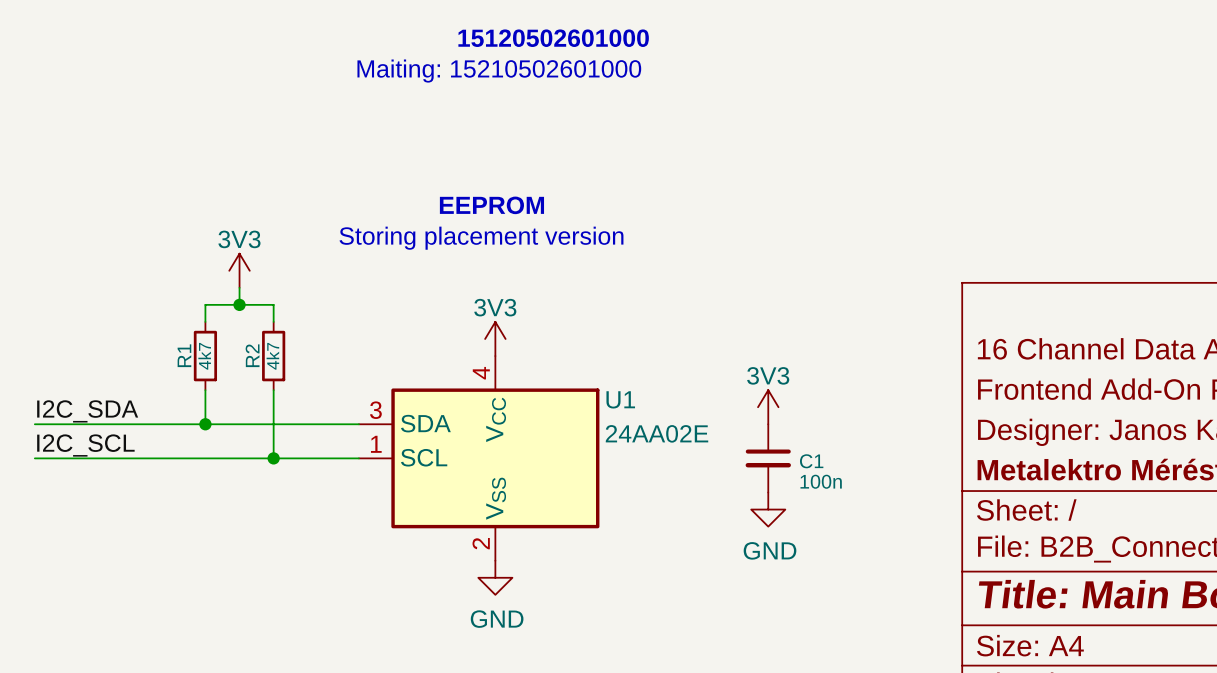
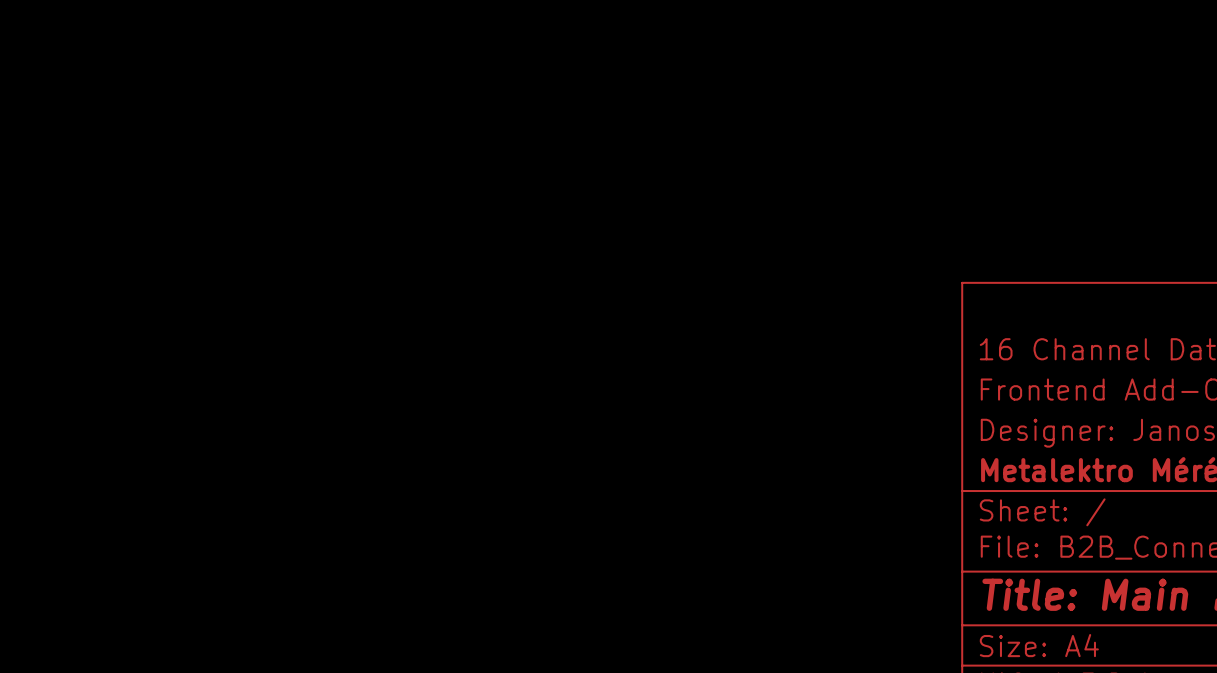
text: 15120502601000 (553, 38) -> none
text: Maiting: 15210502601000 (499, 71) -> none
text: EEPROM (491, 205) -> none
text: Storing placement version (481, 238) -> none
power symbol: 3V3 (239, 270) -> none
wire: (239, 287) (239, 304) -> none
junction: (239, 304) -> none
wire: (205, 321) (205, 304) (273, 304) (273, 321) -> none
power symbol: 3V3 (495, 338) -> none
R1: 4k7 (205, 356) -> none
R2: 4k7 (273, 356) -> none
wire: (205, 390) (205, 424) -> none
wire: (273, 390) (273, 458) -> none
power symbol: 3V3 (768, 407) -> none
label: I2C_SDA (87, 411) -> none
wire: (34, 424) (358, 424) -> none
junction: (205, 424) -> none
label: I2C_SCL (85, 445) -> none
wire: (34, 458) (358, 458) -> none
junction: (273, 458) -> none
U1: 24AA02E (479, 458) -> none
C1: 100n (768, 458) -> none
power symbol: GND (768, 509) -> none
power symbol: GND (495, 577) -> none

